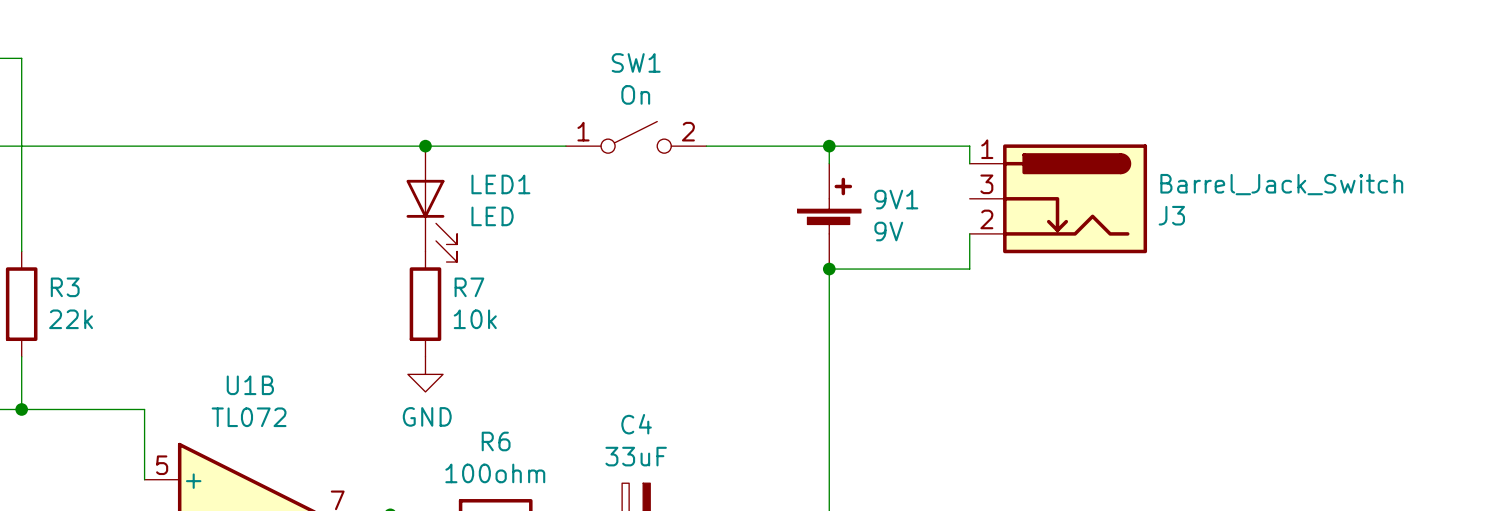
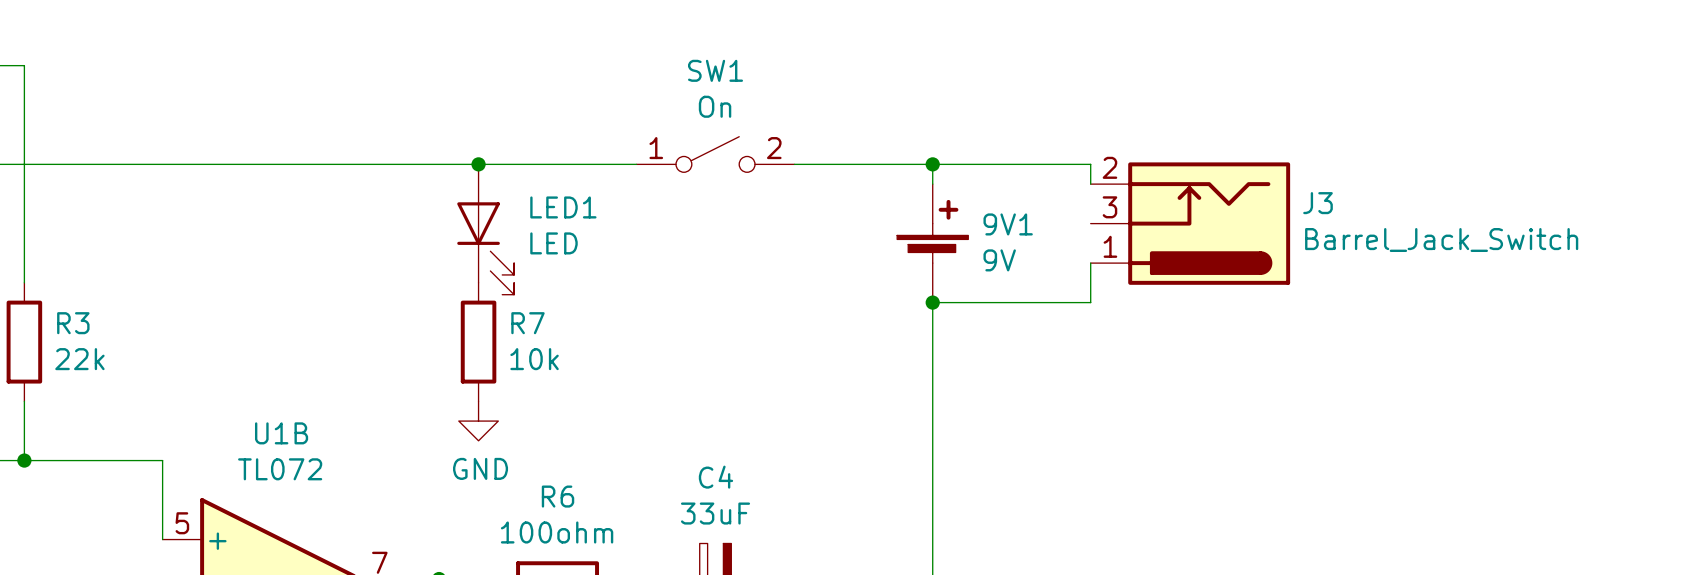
J3 flip: as is (1075, 198) -> up-down (1209, 223)

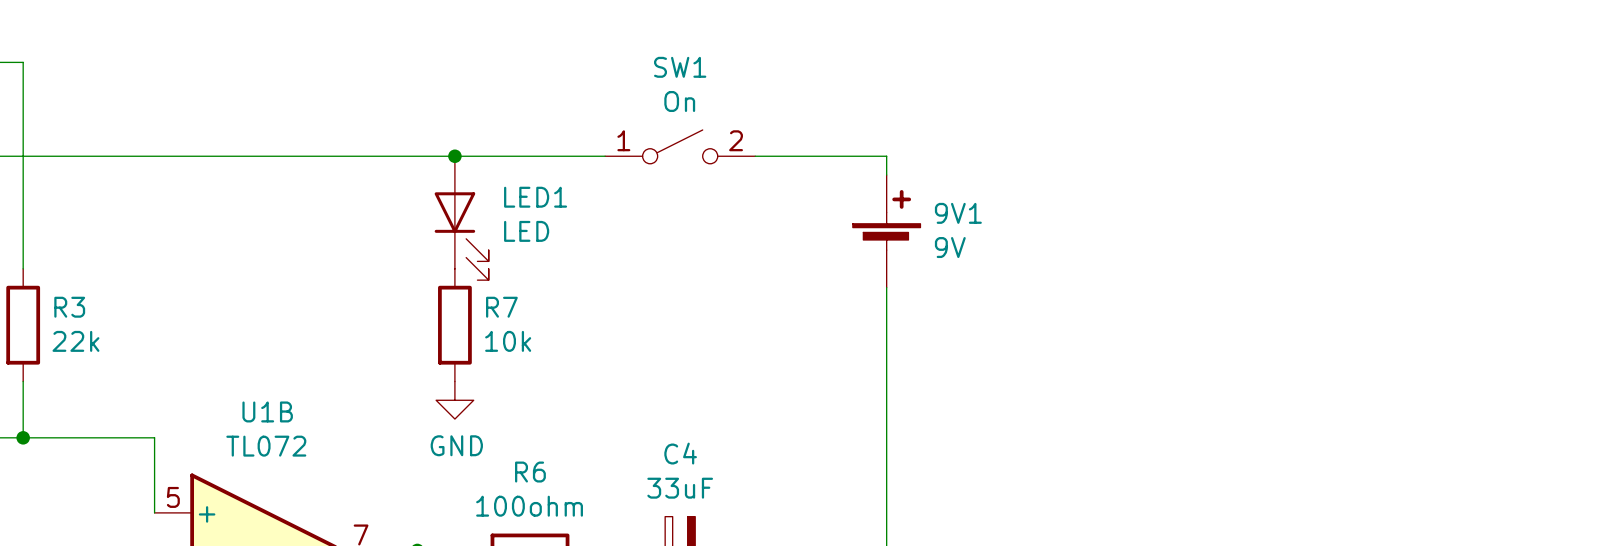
wire: (932, 164) (1090, 164) (1090, 184) -> none
junction: (932, 164) -> none
J3: Barrel_Jack_Switch (1190, 223) -> none
wire: (1090, 263) (1090, 302) (932, 302) -> none
junction: (932, 302) -> none

